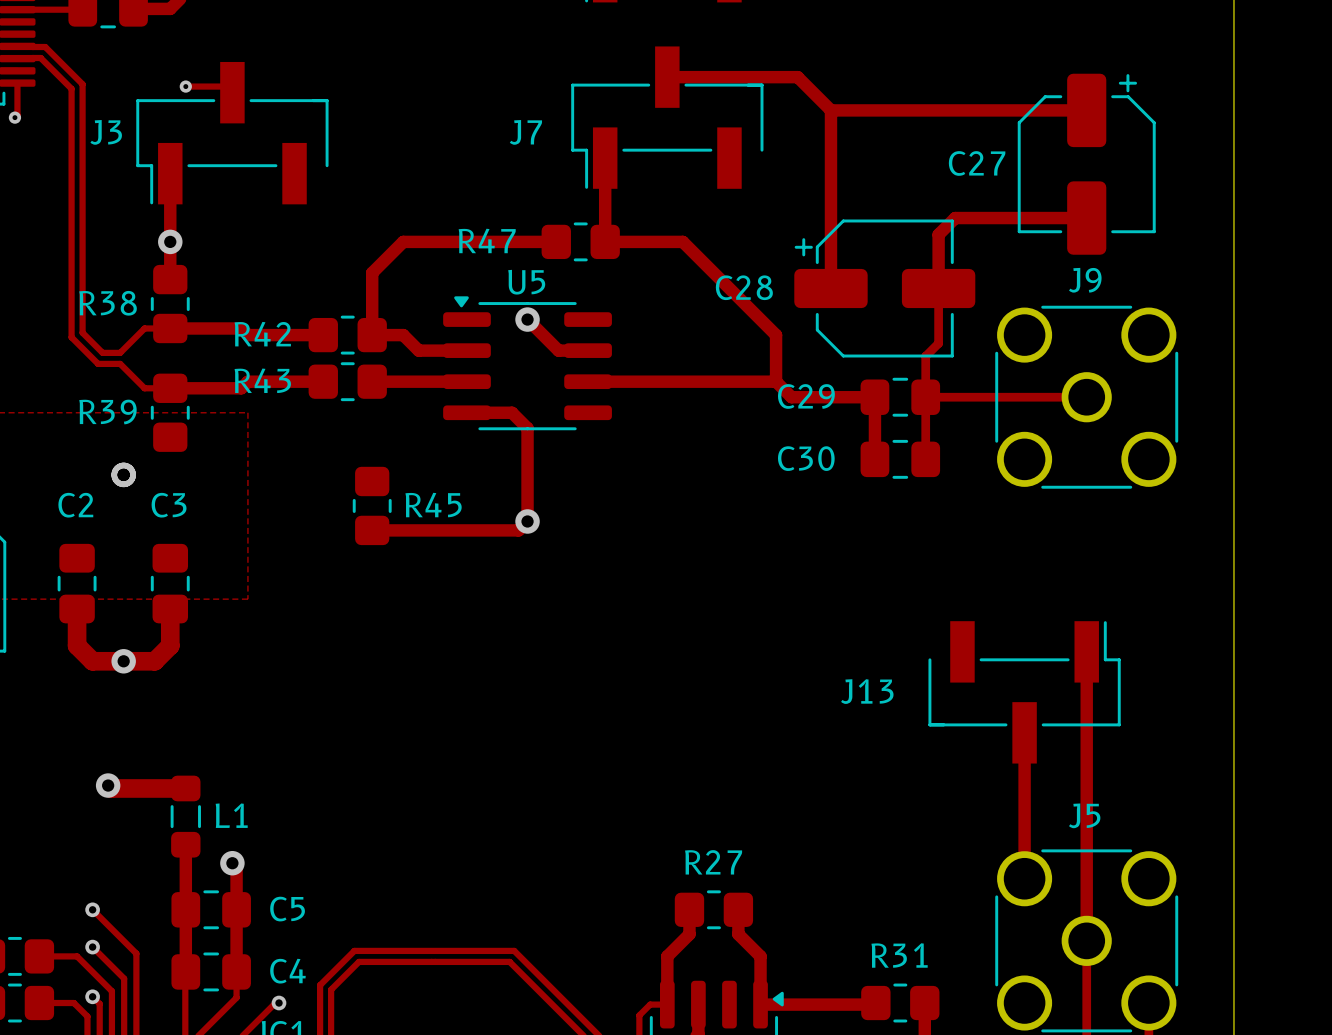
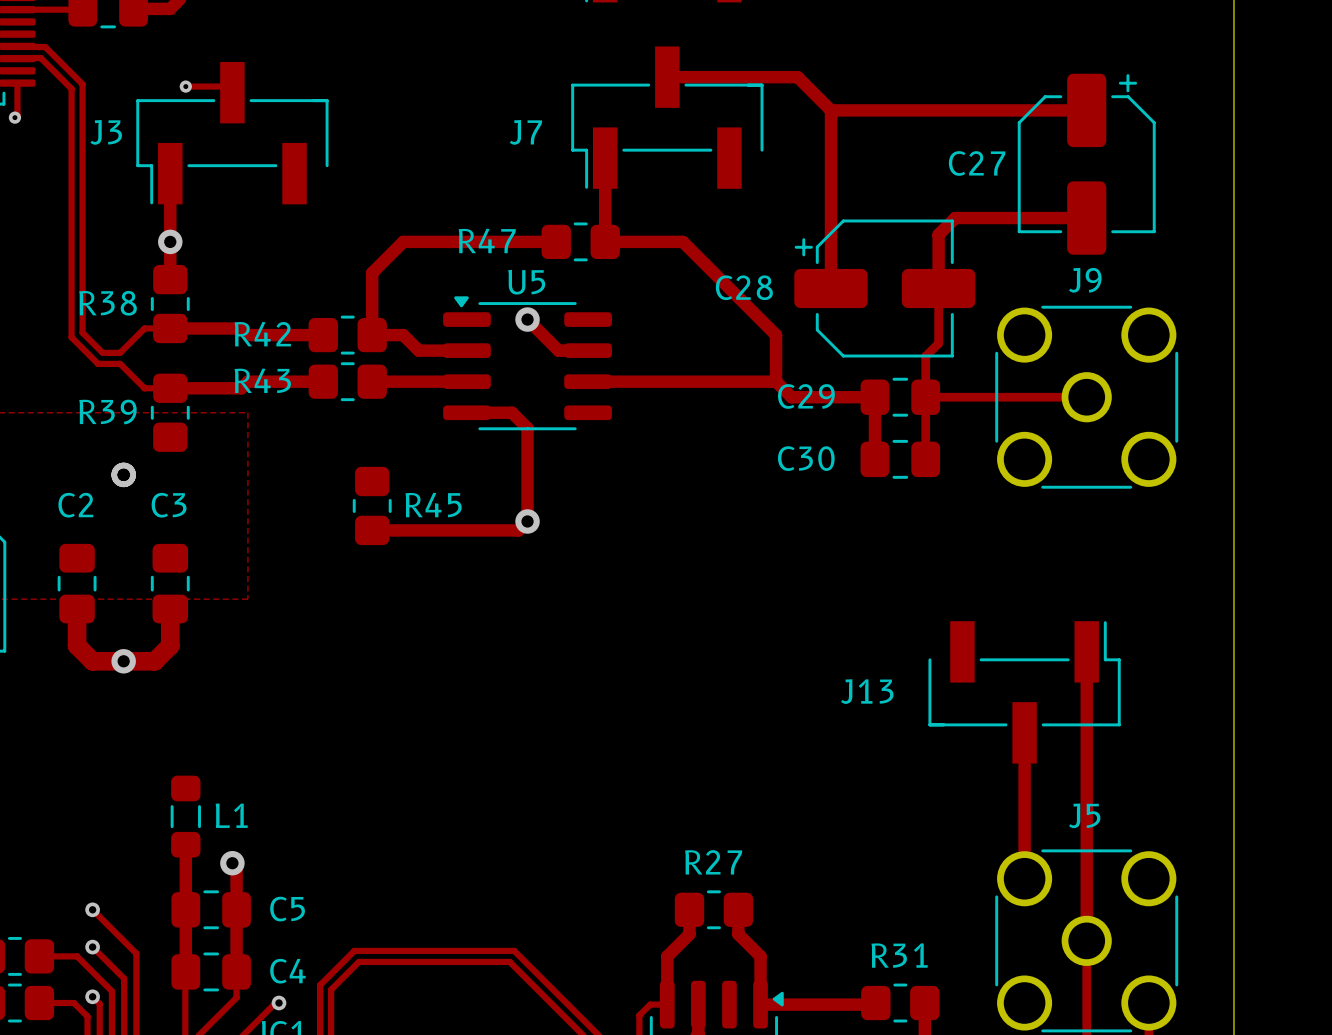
track: (108, 785) (111, 788) (185, 788) -> none
via: (108, 785) -> none

